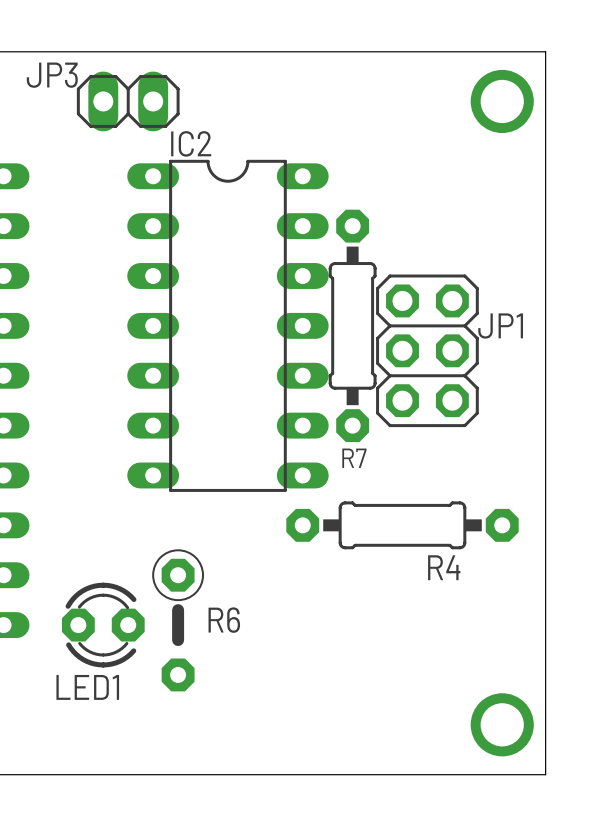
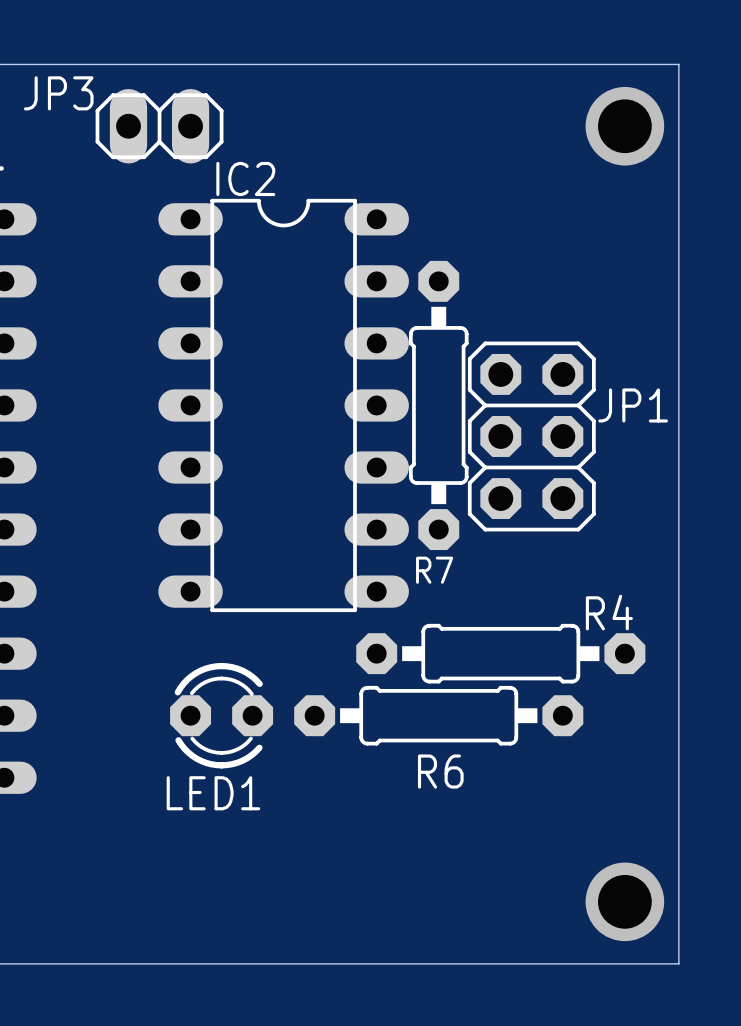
R6 footprint: [152, 549, 205, 692] -> [294, 685, 584, 746]
R4 name position: R4 (444, 567) -> R4 (609, 612)
R6 name position: R6 (224, 620) -> R6 (440, 771)
LED1 position: (103, 625) -> (221, 715)

